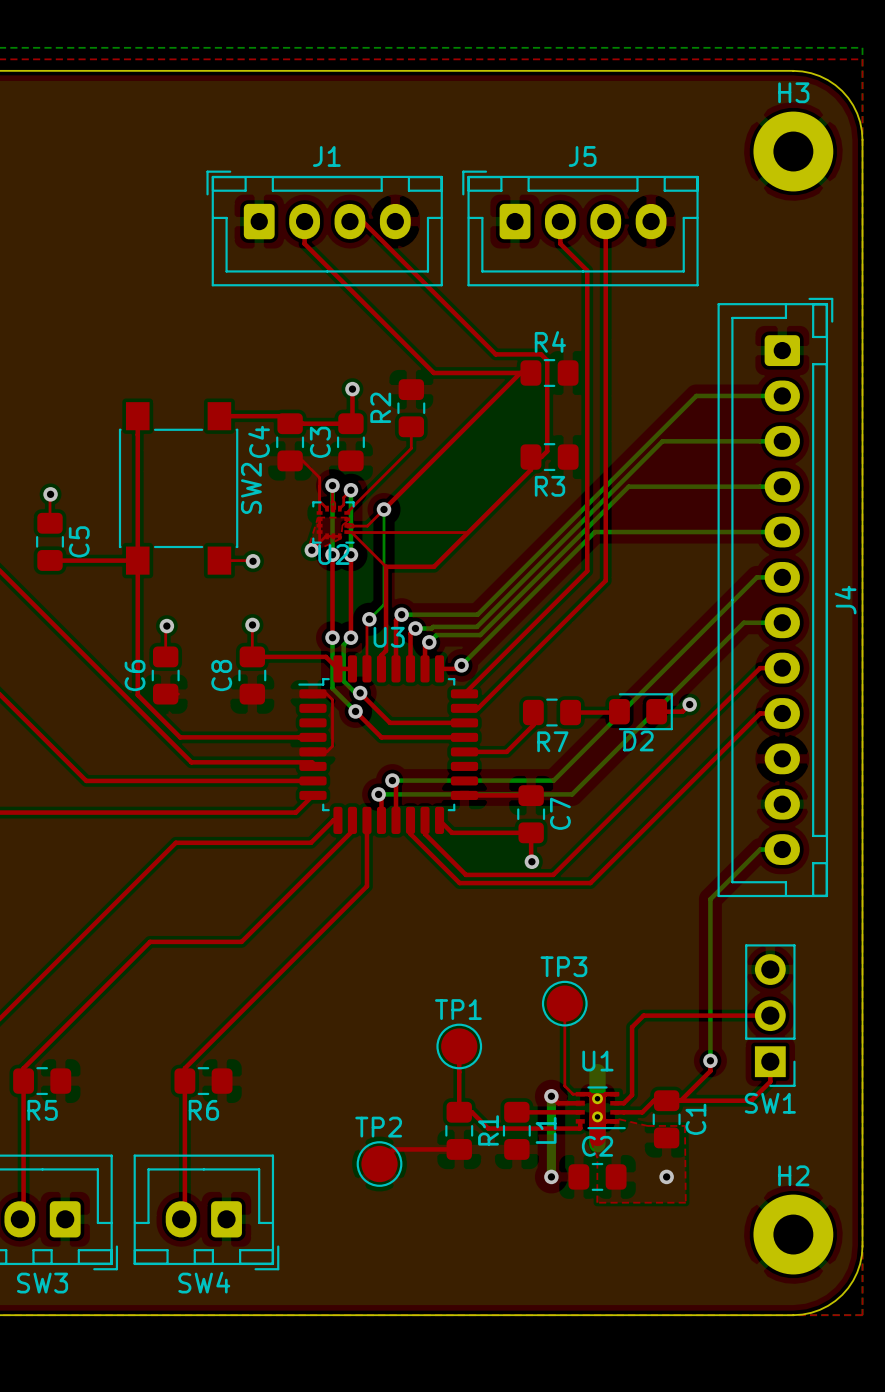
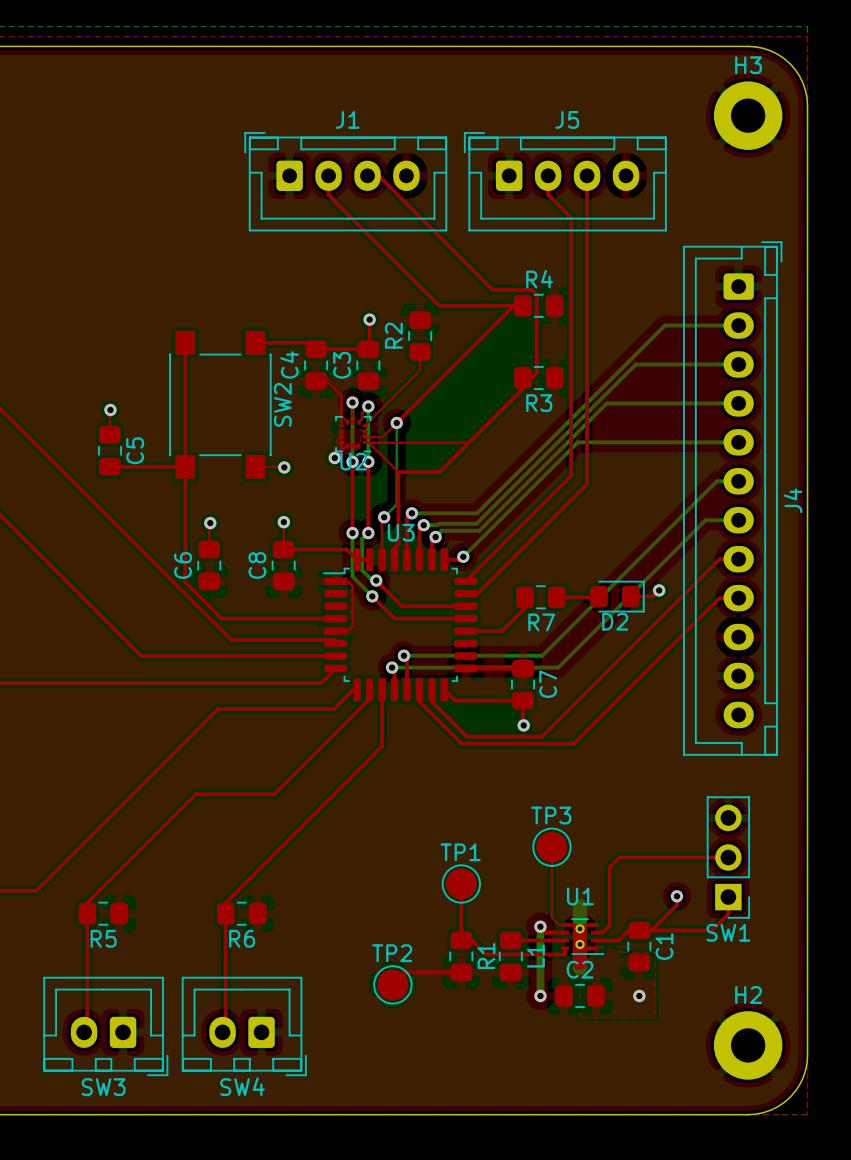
bottom track: (782, 849) (760, 849) (710, 899) (710, 1060) -> none

